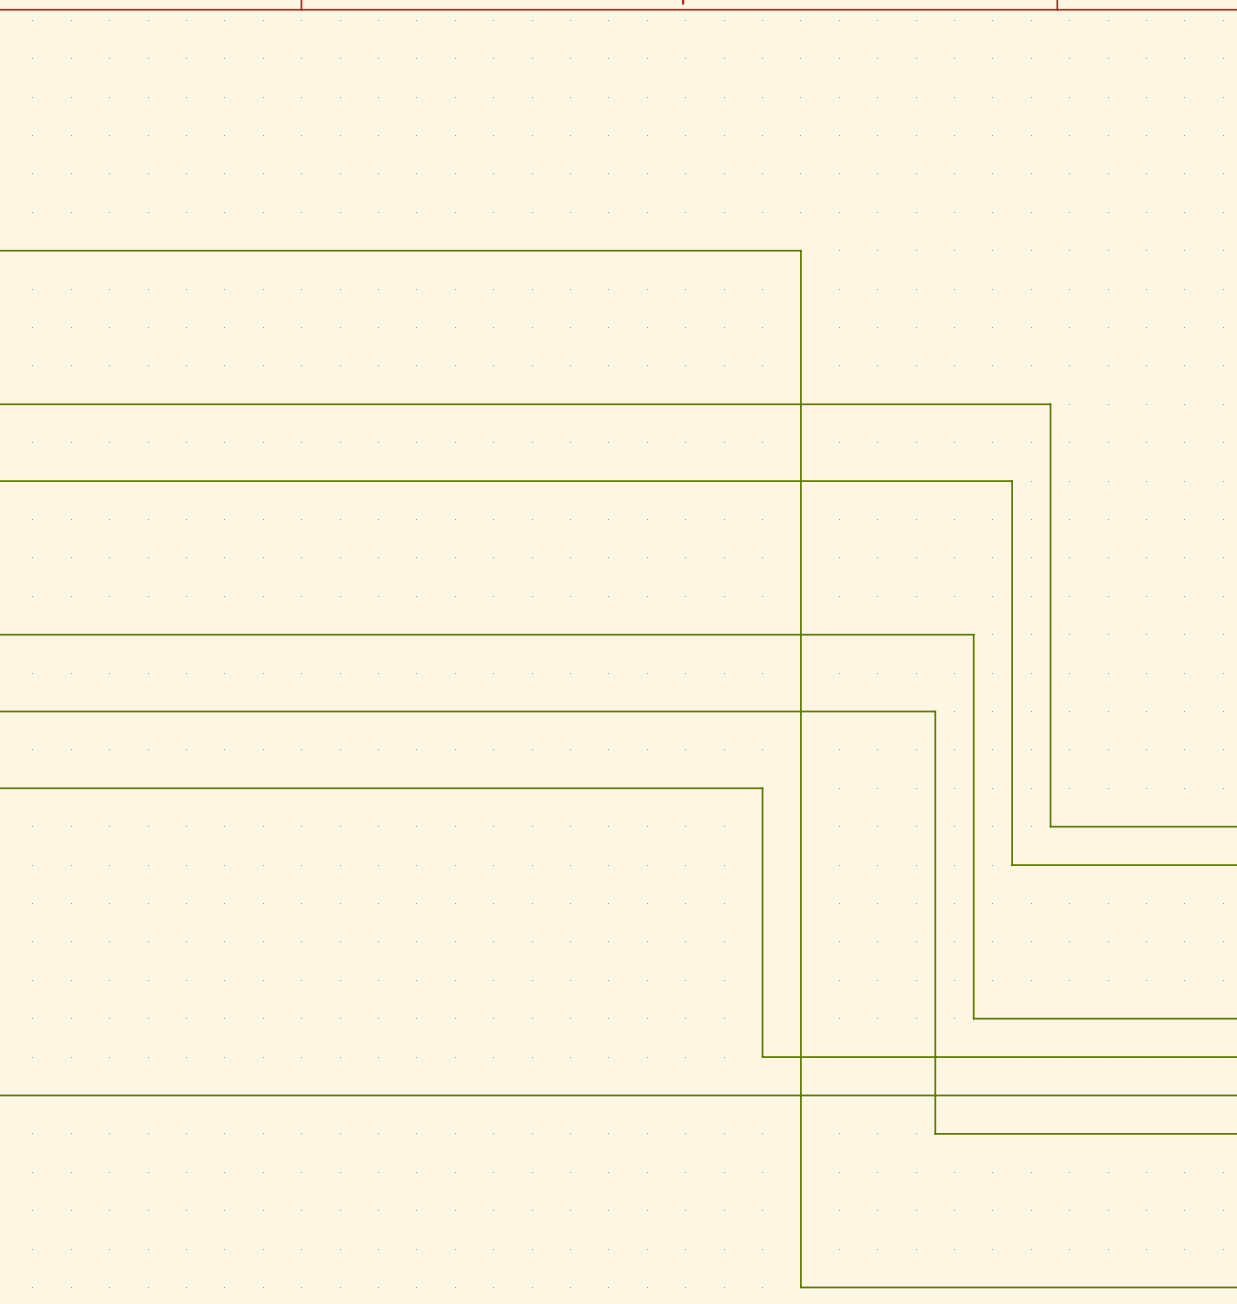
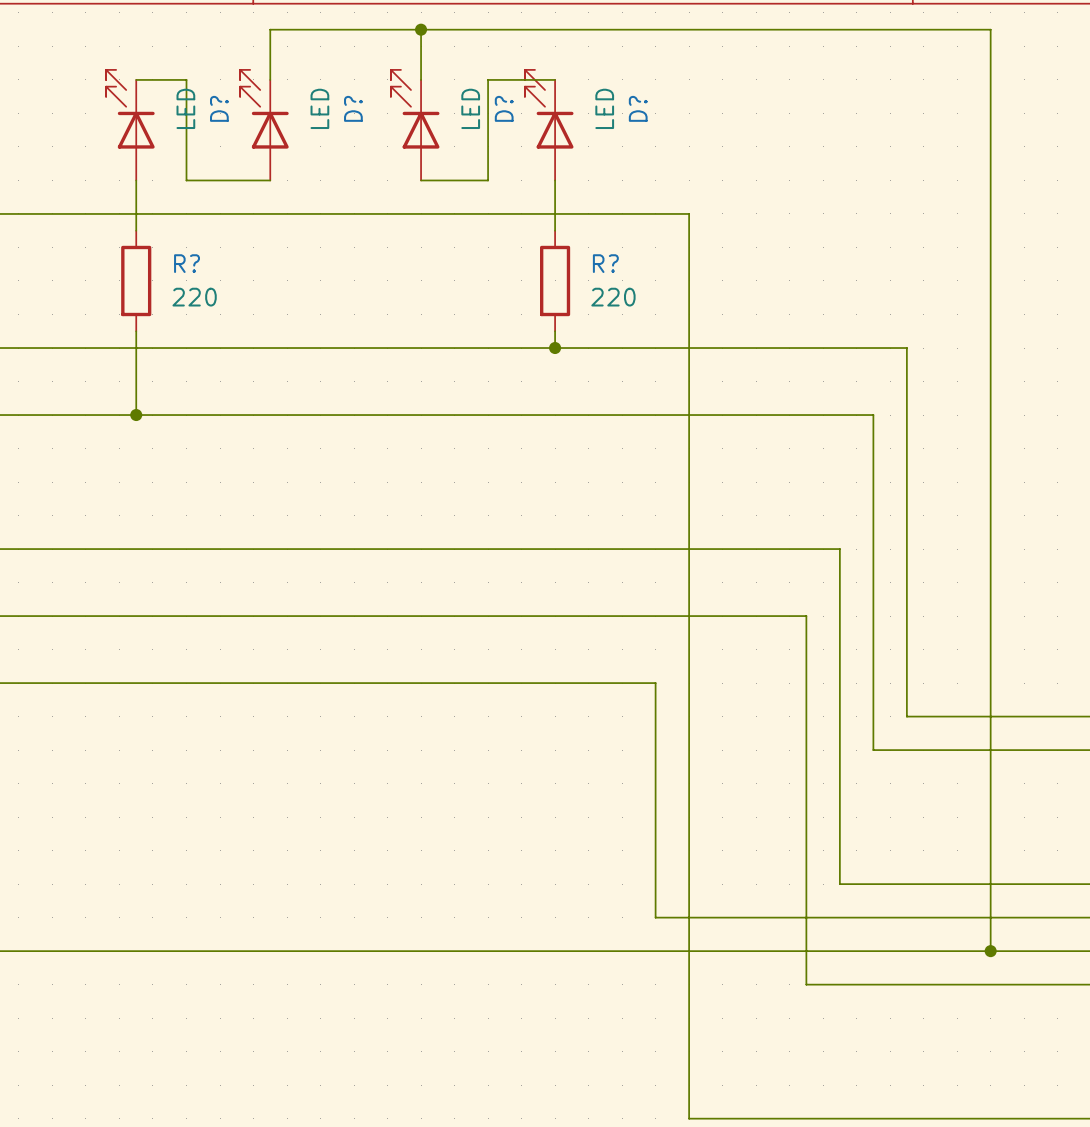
wire: none -> (421, 29) (421, 79)
junction: none -> (421, 29)
wire: none -> (136, 79) (186, 79) (186, 180) (270, 180)
wire: none -> (270, 79) (270, 29) (990, 29) (990, 951)
wire: none -> (555, 79) (488, 79) (488, 180) (421, 180)
D?: none -> LED (130, 125)
D?: none -> LED (264, 125)
D?: none -> LED (415, 125)
D?: none -> LED (549, 125)
wire: none -> (136, 180) (136, 230)
wire: none -> (555, 180) (555, 230)
R?: none -> 220 (136, 280)
R?: none -> 220 (555, 280)
wire: none -> (136, 331) (136, 415)
wire: none -> (555, 331) (555, 348)
junction: none -> (555, 348)
junction: none -> (136, 415)
junction: none -> (990, 951)

